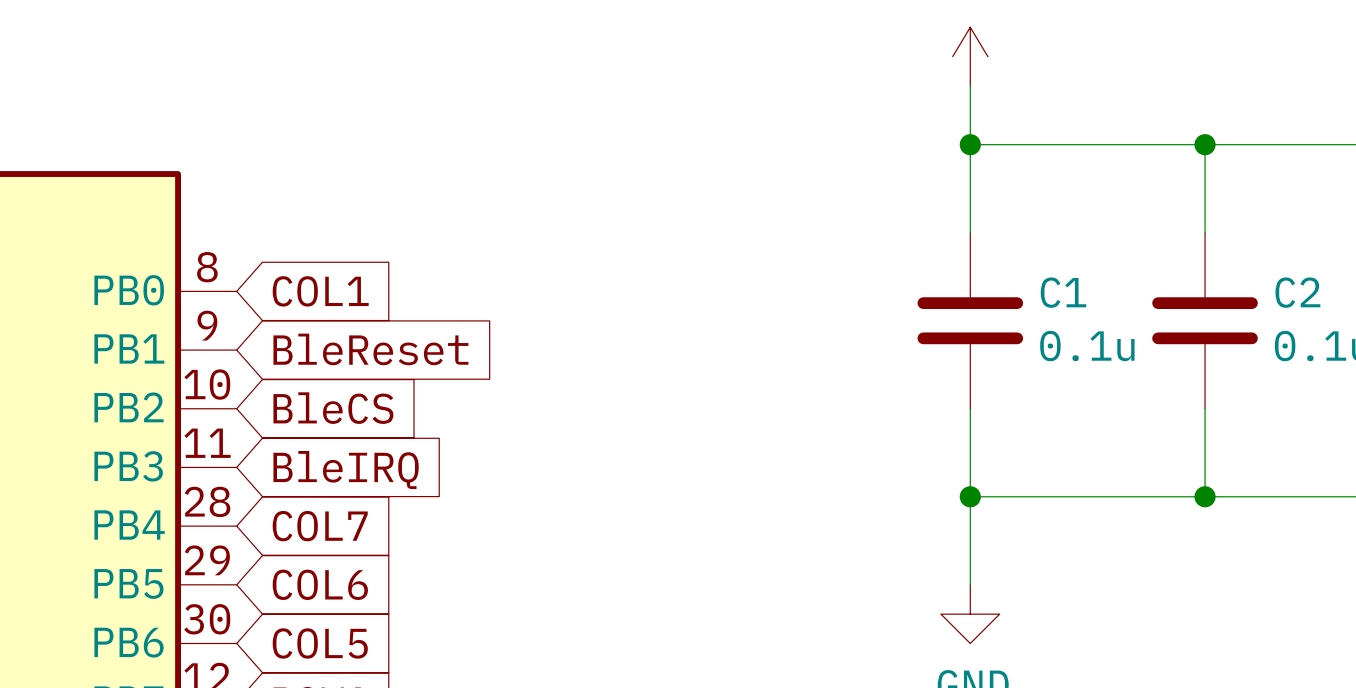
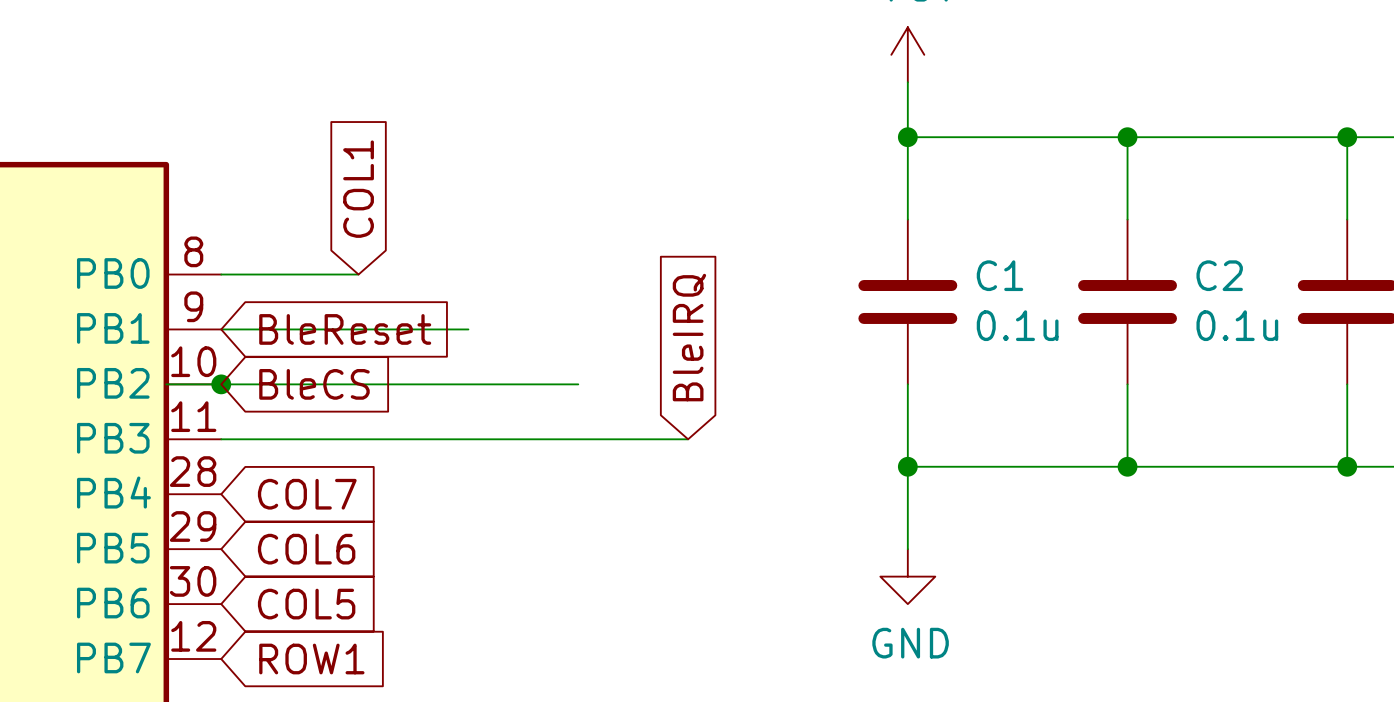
wire: none -> (221, 274) (358, 274)
global label rotation: 0° (320, 291) -> 90° counterclockwise (358, 189)
wire: none -> (221, 329) (468, 329)
wire: none -> (166, 384) (578, 384)
junction: none -> (221, 384)
wire: none -> (221, 439) (688, 439)
global label rotation: 0° (346, 470) -> 90° counterclockwise (689, 337)
global label position: BleIRQ (346, 470) -> BleIRQ (689, 337)

